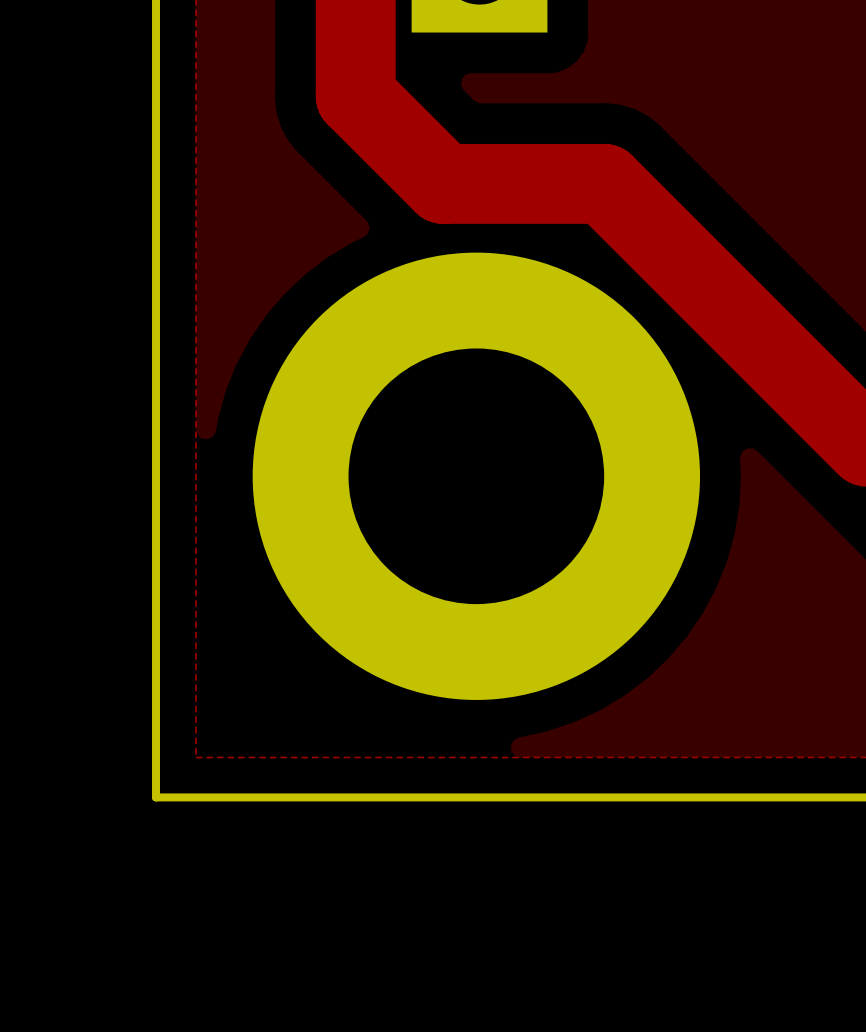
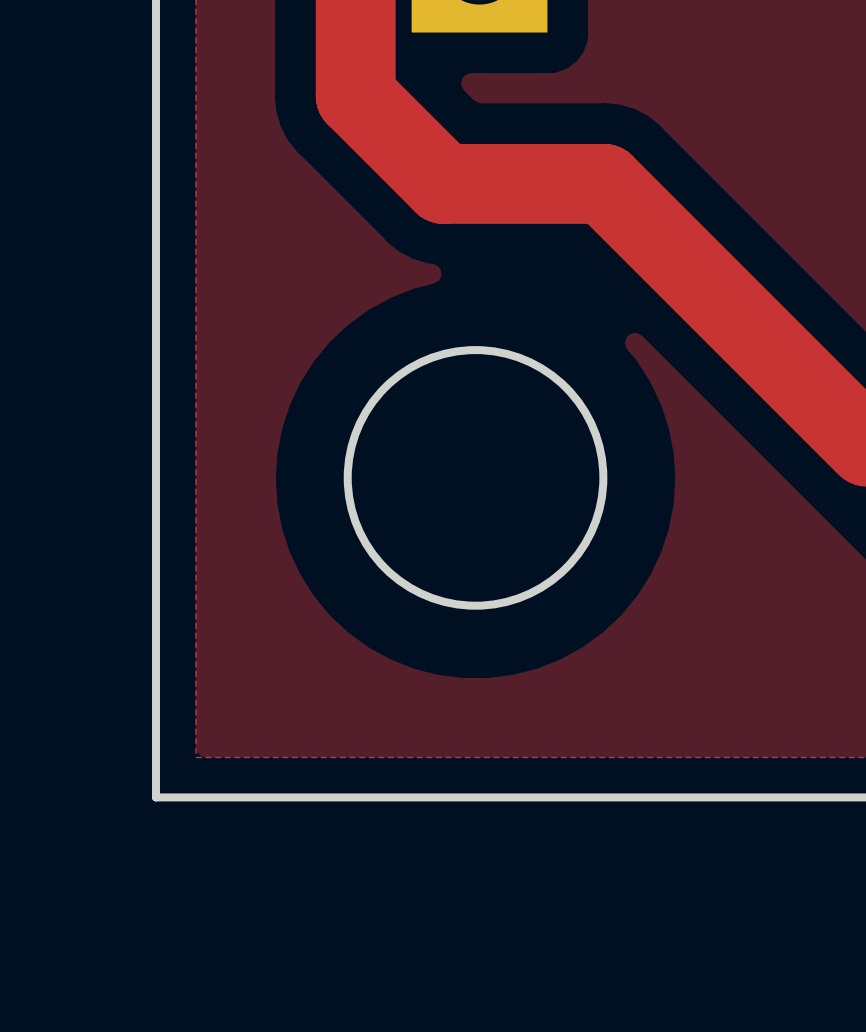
round board edge: none -> [343, 346, 608, 610]
part: (476, 476) -> none

